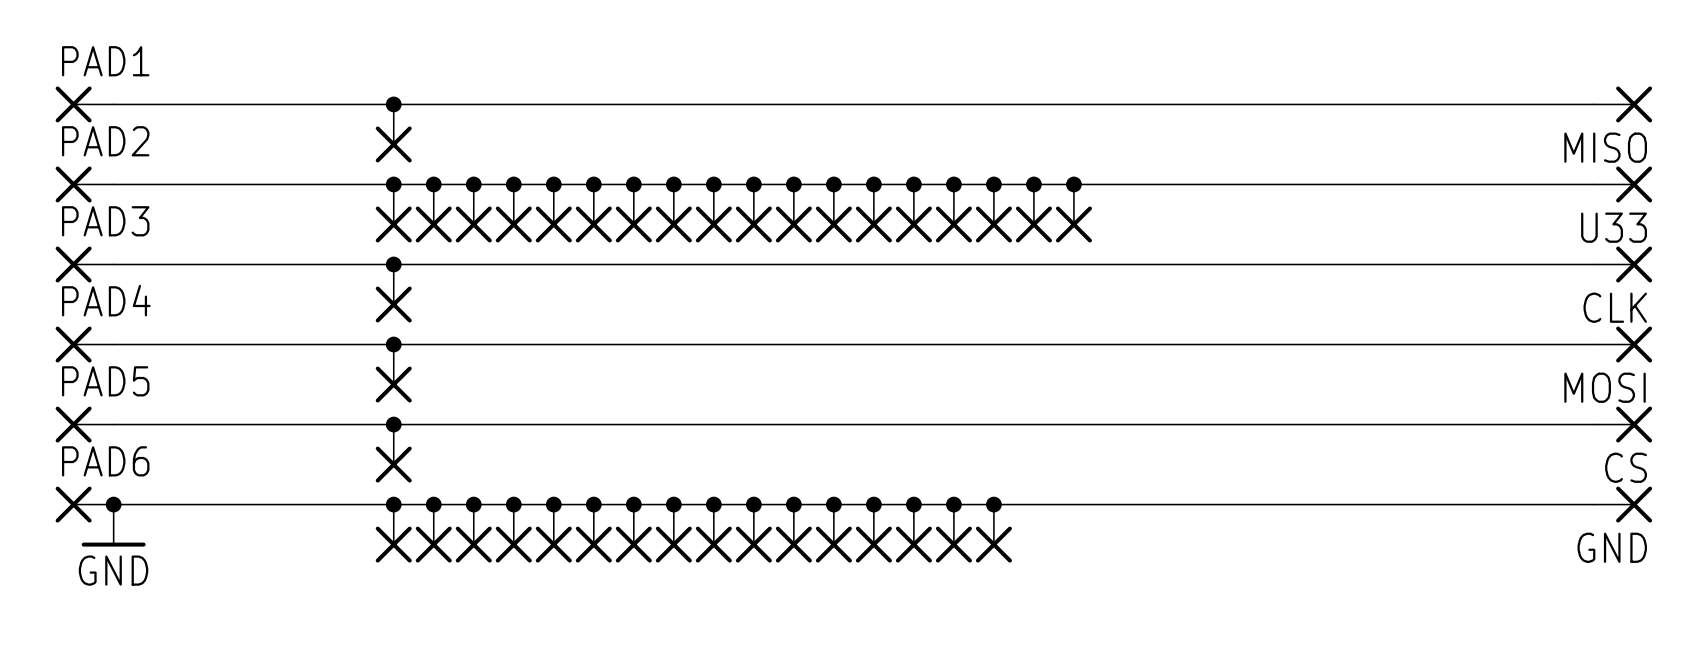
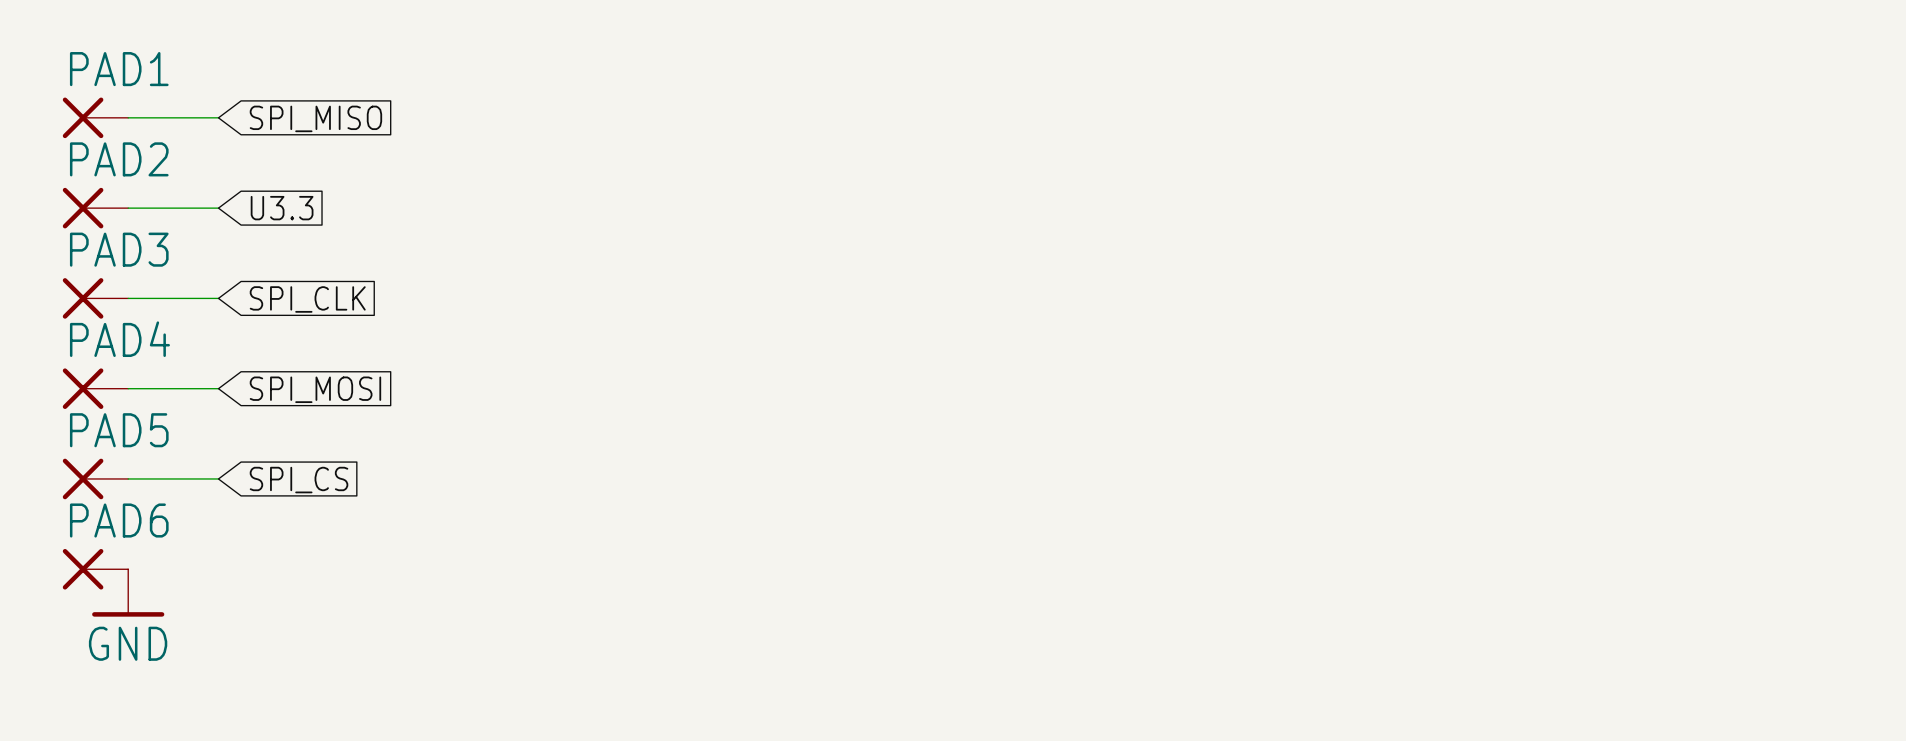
wire: (193, 104) (1594, 104) -> none
junction: (393, 104) -> none
MISO: (1623, 104) -> none
global label: none -> SPI_MISO (315, 118)
part: (393, 133) -> none
wire: (193, 184) (1594, 184) -> none
global label: none -> U3.3 (282, 208)
junction: (393, 184) -> none
junction: (433, 184) -> none
junction: (473, 184) -> none
junction: (513, 184) -> none
junction: (553, 184) -> none
junction: (593, 184) -> none
junction: (633, 184) -> none
junction: (673, 184) -> none
junction: (713, 184) -> none
junction: (753, 184) -> none
junction: (793, 184) -> none
junction: (833, 184) -> none
junction: (873, 184) -> none
junction: (913, 184) -> none
junction: (953, 184) -> none
junction: (993, 184) -> none
junction: (1033, 184) -> none
junction: (1073, 184) -> none
U33: (1623, 184) -> none
part: (393, 213) -> none
part: (433, 213) -> none
part: (473, 213) -> none
part: (513, 213) -> none
part: (553, 213) -> none
part: (593, 213) -> none
part: (633, 213) -> none
part: (673, 213) -> none
part: (713, 213) -> none
part: (753, 213) -> none
part: (793, 213) -> none
part: (833, 213) -> none
part: (873, 213) -> none
part: (913, 213) -> none
part: (953, 213) -> none
part: (993, 213) -> none
part: (1033, 213) -> none
part: (1073, 213) -> none
wire: (193, 264) (1594, 264) -> none
junction: (393, 264) -> none
CLK: (1623, 264) -> none
global label: none -> SPI_CLK (307, 299)
part: (393, 293) -> none
wire: (193, 344) (1594, 344) -> none
junction: (393, 344) -> none
MOSI: (1623, 344) -> none
global label: none -> SPI_MOSI (315, 389)
part: (393, 373) -> none
wire: (193, 424) (1594, 424) -> none
junction: (393, 424) -> none
CS: (1623, 424) -> none
global label: none -> SPI_CS (299, 480)
part: (393, 453) -> none
wire: (113, 504) (1594, 504) -> none
junction: (113, 504) -> none
junction: (393, 504) -> none
junction: (433, 504) -> none
junction: (473, 504) -> none
junction: (513, 504) -> none
junction: (553, 504) -> none
junction: (593, 504) -> none
junction: (633, 504) -> none
junction: (673, 504) -> none
junction: (713, 504) -> none
junction: (753, 504) -> none
junction: (793, 504) -> none
junction: (833, 504) -> none
junction: (873, 504) -> none
junction: (913, 504) -> none
junction: (953, 504) -> none
junction: (993, 504) -> none
GND: (1623, 504) -> none
part: (393, 533) -> none
part: (433, 533) -> none
part: (473, 533) -> none
part: (513, 533) -> none
part: (553, 533) -> none
part: (593, 533) -> none
part: (633, 533) -> none
part: (673, 533) -> none
part: (713, 533) -> none
part: (753, 533) -> none
part: (793, 533) -> none
part: (833, 533) -> none
part: (873, 533) -> none
part: (913, 533) -> none
part: (953, 533) -> none
part: (993, 533) -> none

